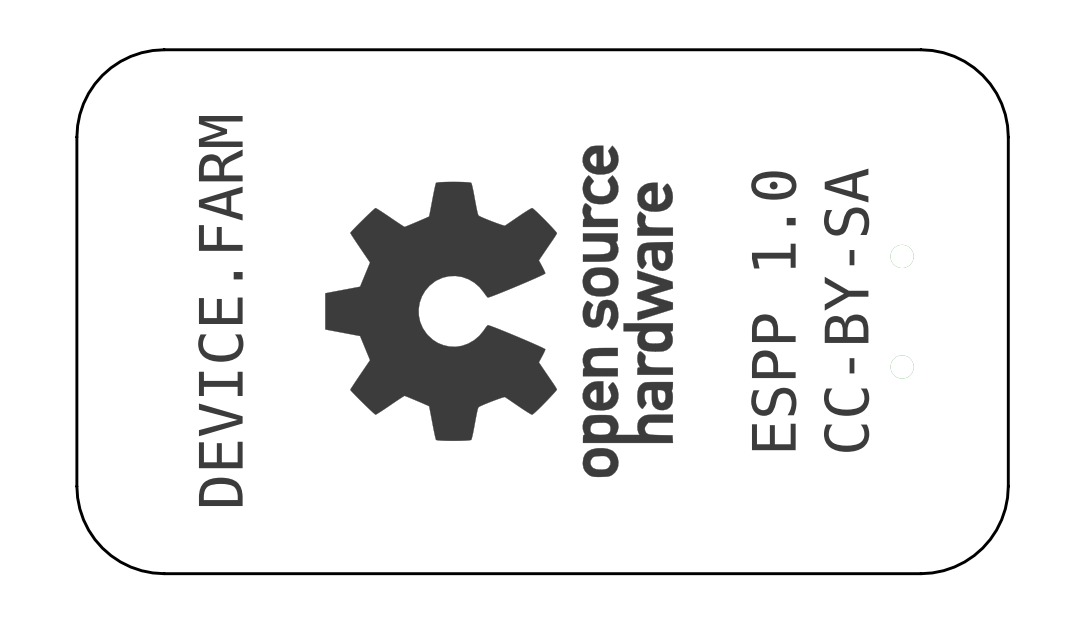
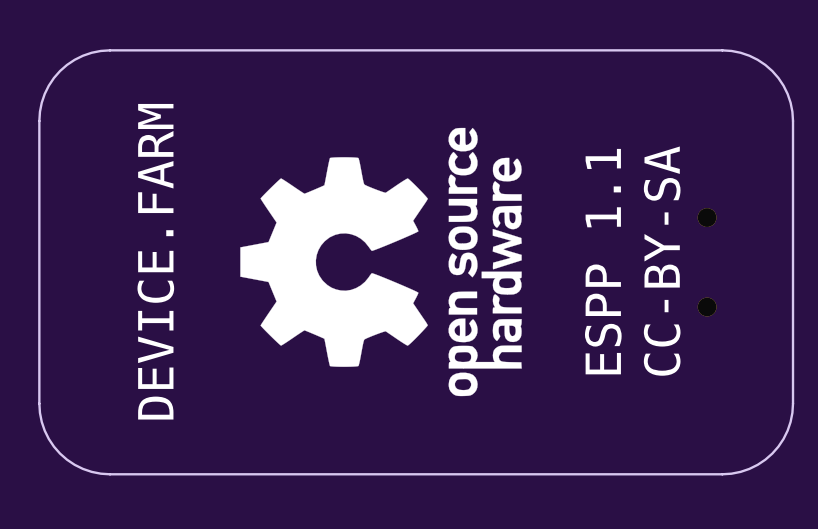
text: ESPP 1.0 (773, 310) -> ESPP 1.1 (603, 261)

